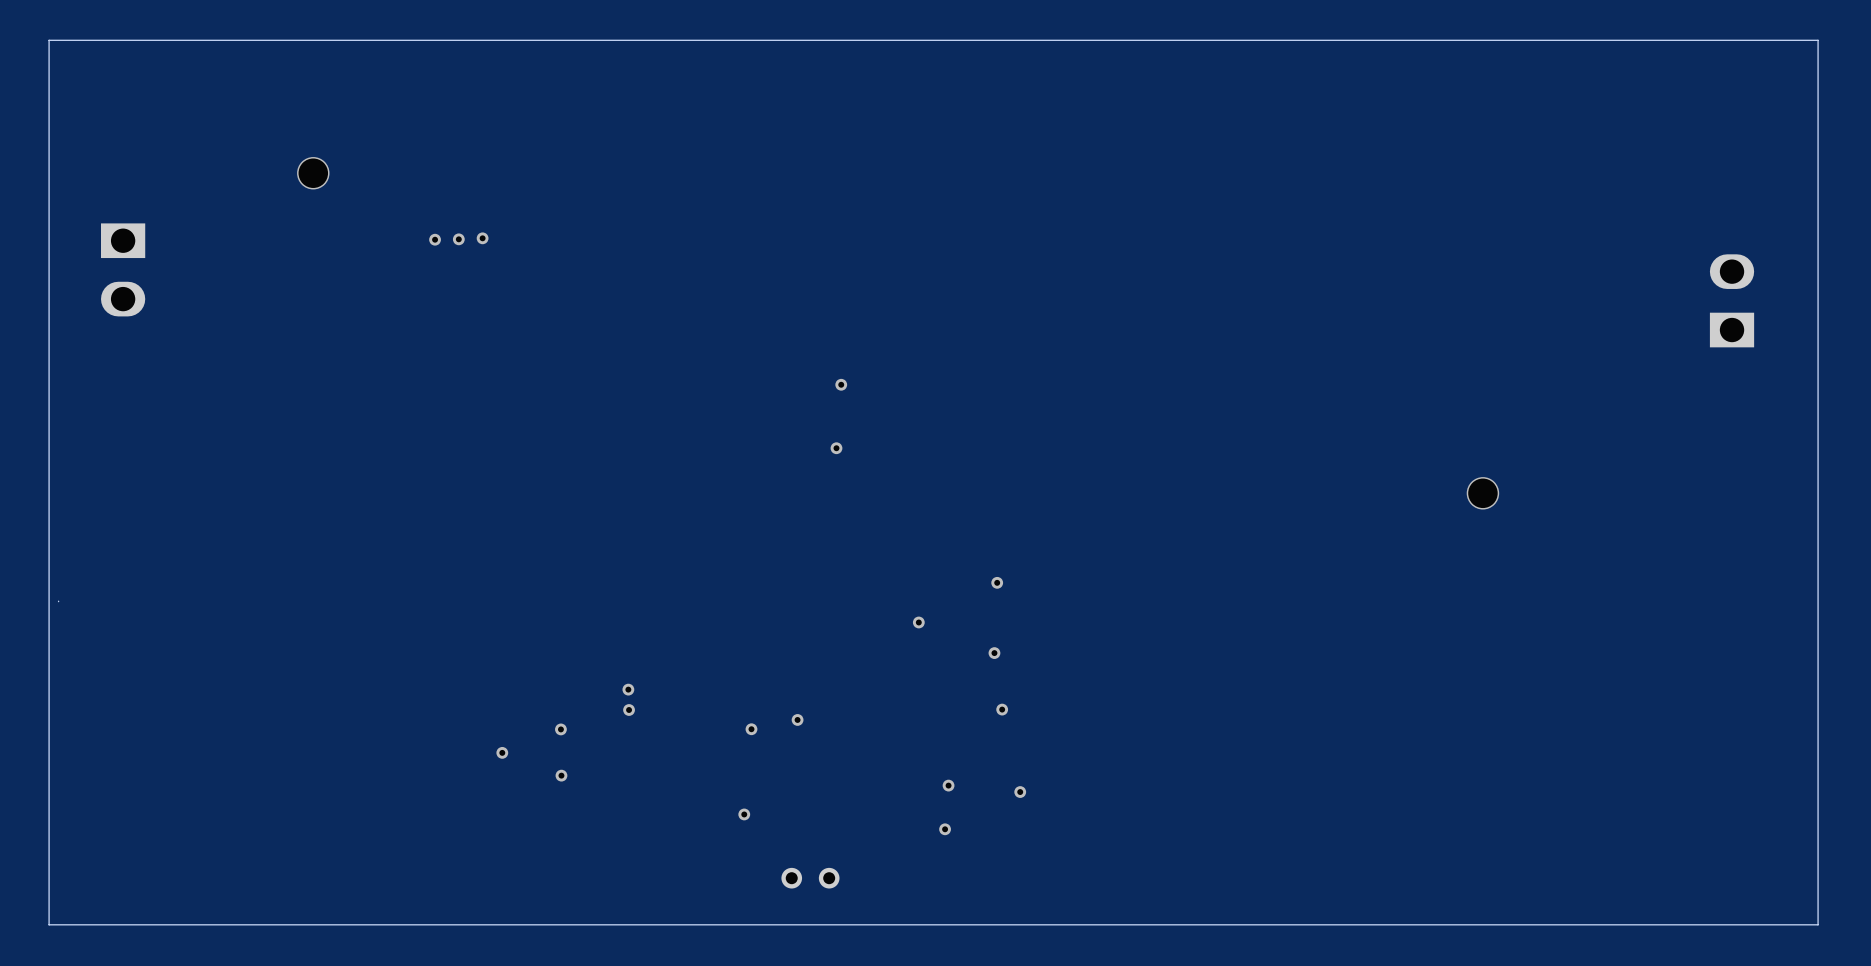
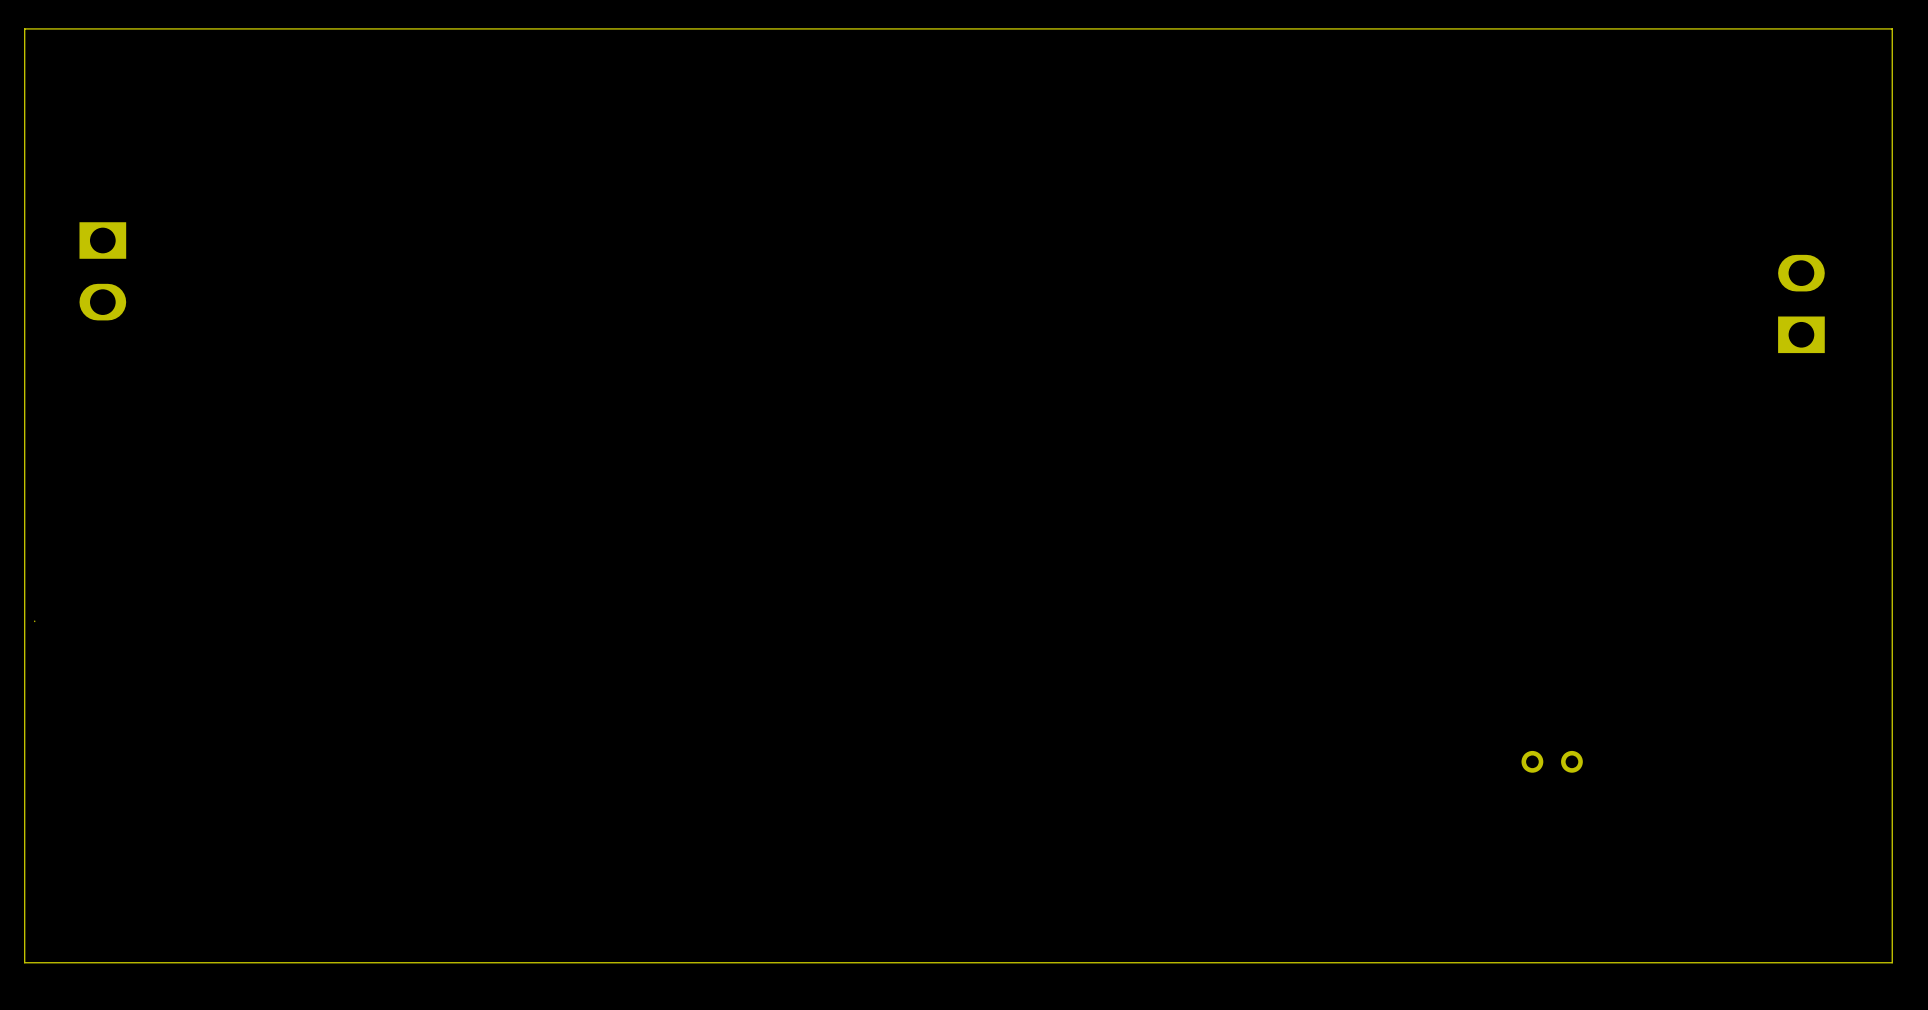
via: (313, 173) -> none
via: (482, 238) -> none
via: (435, 239) -> none
via: (458, 239) -> none
via: (841, 384) -> none
via: (836, 448) -> none
via: (1482, 493) -> none
via: (997, 582) -> none
via: (918, 622) -> none
via: (994, 653) -> none
via: (628, 689) -> none
via: (1002, 709) -> none
via: (629, 710) -> none
via: (797, 719) -> none
via: (560, 729) -> none
via: (751, 729) -> none
part: none -> (1552, 761)
via: (502, 752) -> none
via: (561, 775) -> none
via: (948, 785) -> none
via: (1020, 792) -> none
via: (744, 814) -> none
via: (945, 829) -> none
part: (810, 878) -> none

